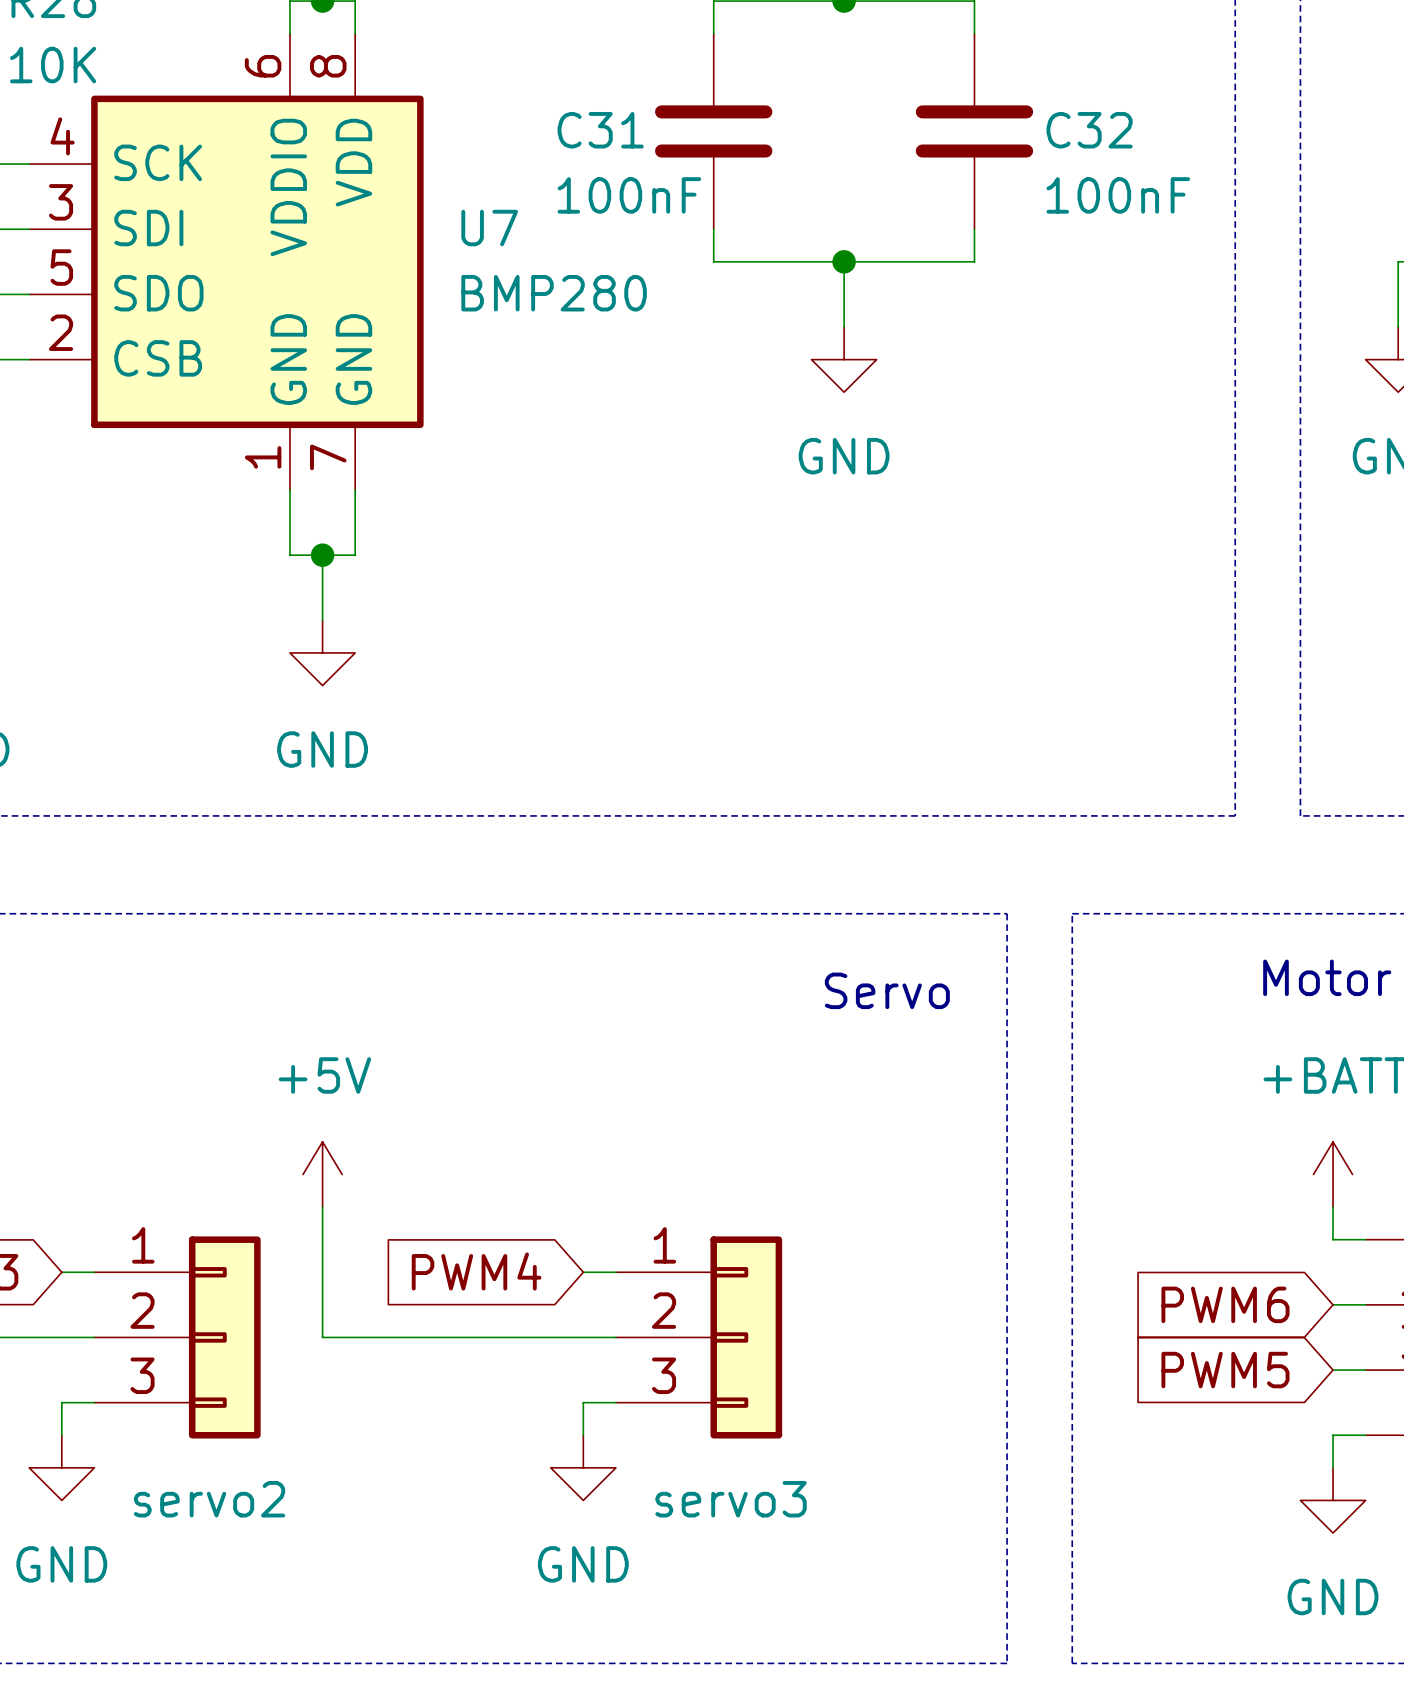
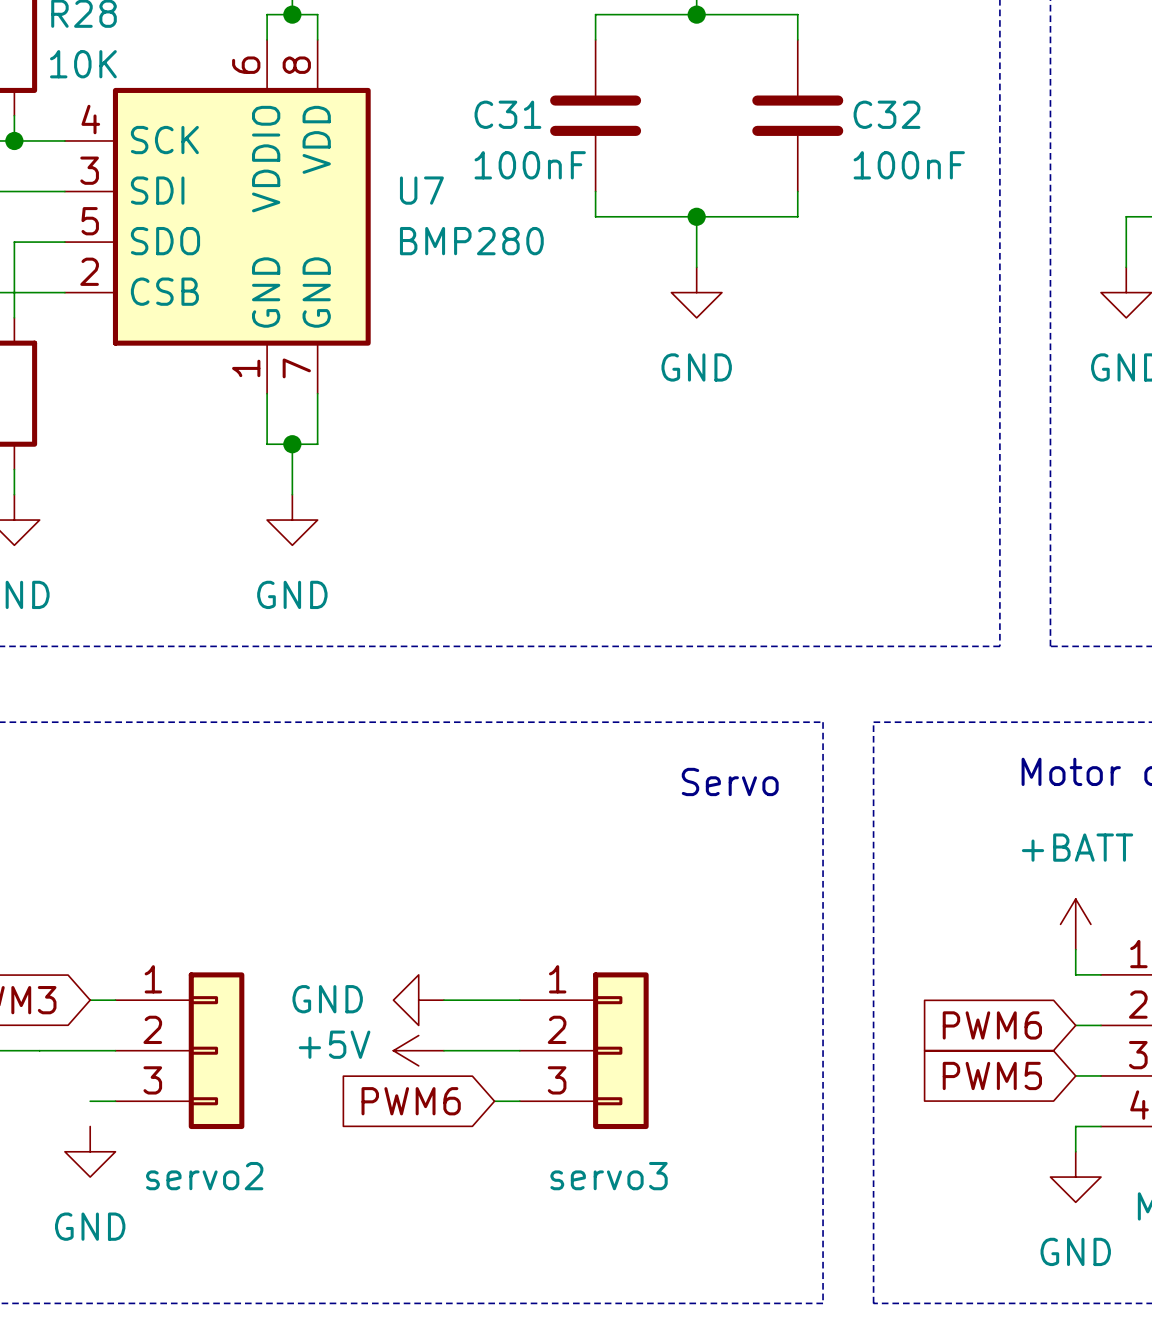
power symbol rotation: 0° (322, 1174) -> 90° counterclockwise (418, 1050)
power symbol position: +5V (322, 1174) -> +5V (418, 1050)
wire: (322, 1207) (322, 1337) (518, 1337) -> none
global label: PWM4 (476, 1271) -> none
wire: none -> (443, 1000) (494, 1000)
wire: (61, 1402) (61, 1435) -> none
global label: none -> PWM6 (411, 1101)
wire: (583, 1402) (583, 1435) -> none
power symbol rotation: 0° (583, 1467) -> 90° clockwise (418, 1000)
power symbol position: GND (583, 1467) -> GND (418, 1000)

